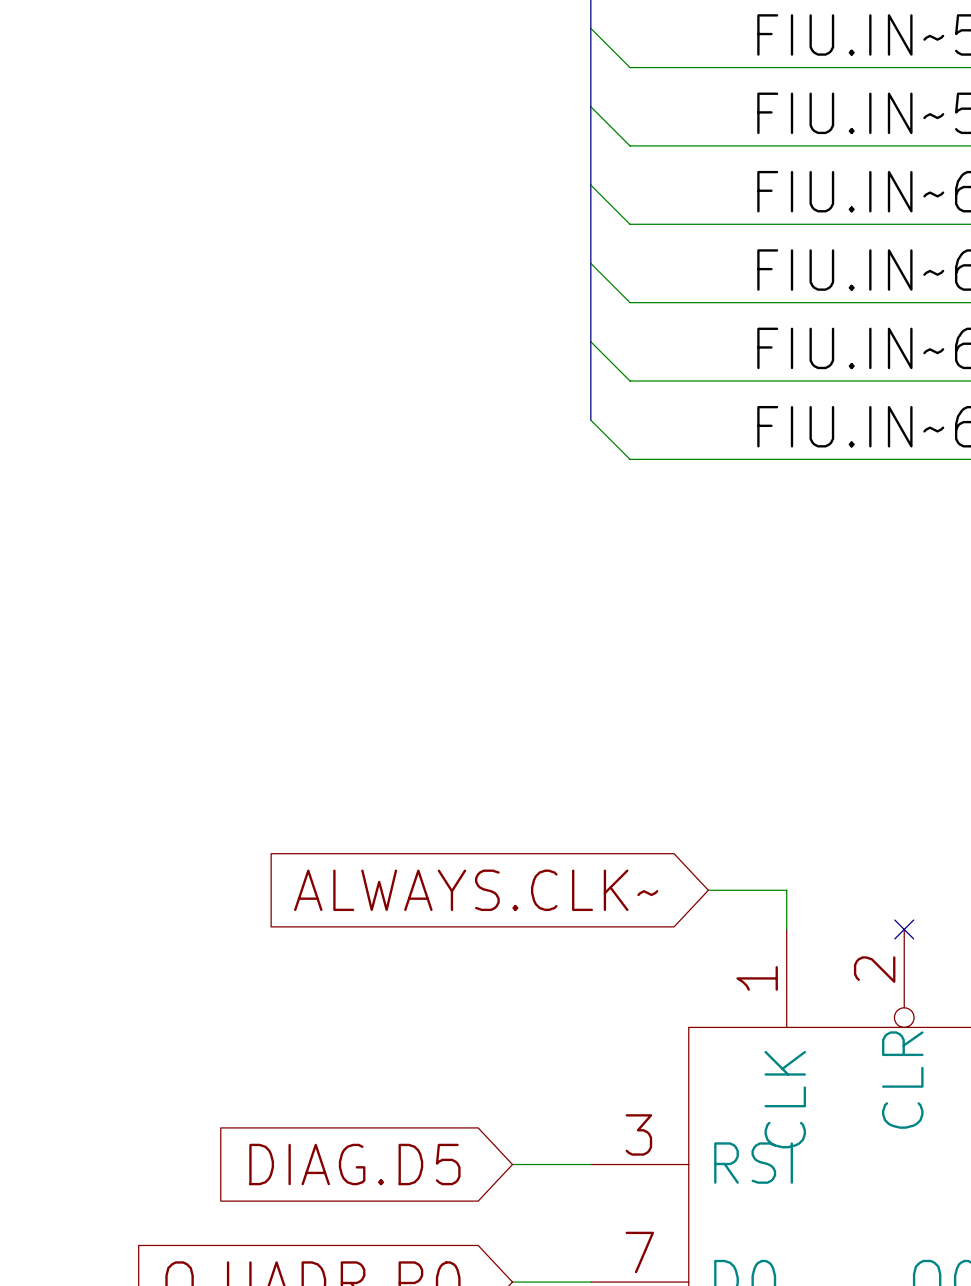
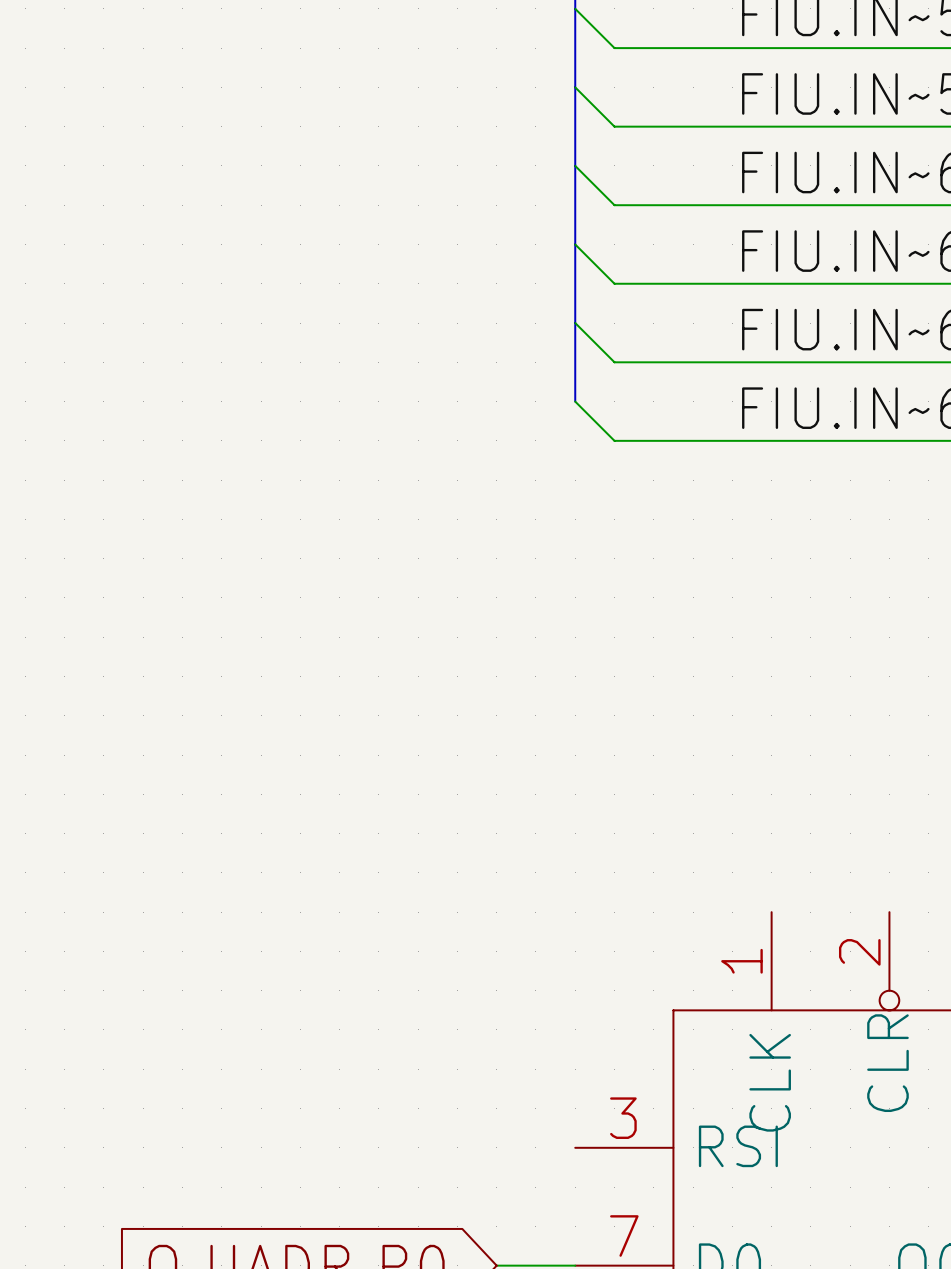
global label: ALWAYS.CLK~ (476, 890) -> none
wire: (708, 890) (786, 890) (786, 929) -> none
no-connect mark: (904, 929) -> none
global label: DIAG.D5 (354, 1164) -> none
wire: (512, 1164) (590, 1164) -> none

